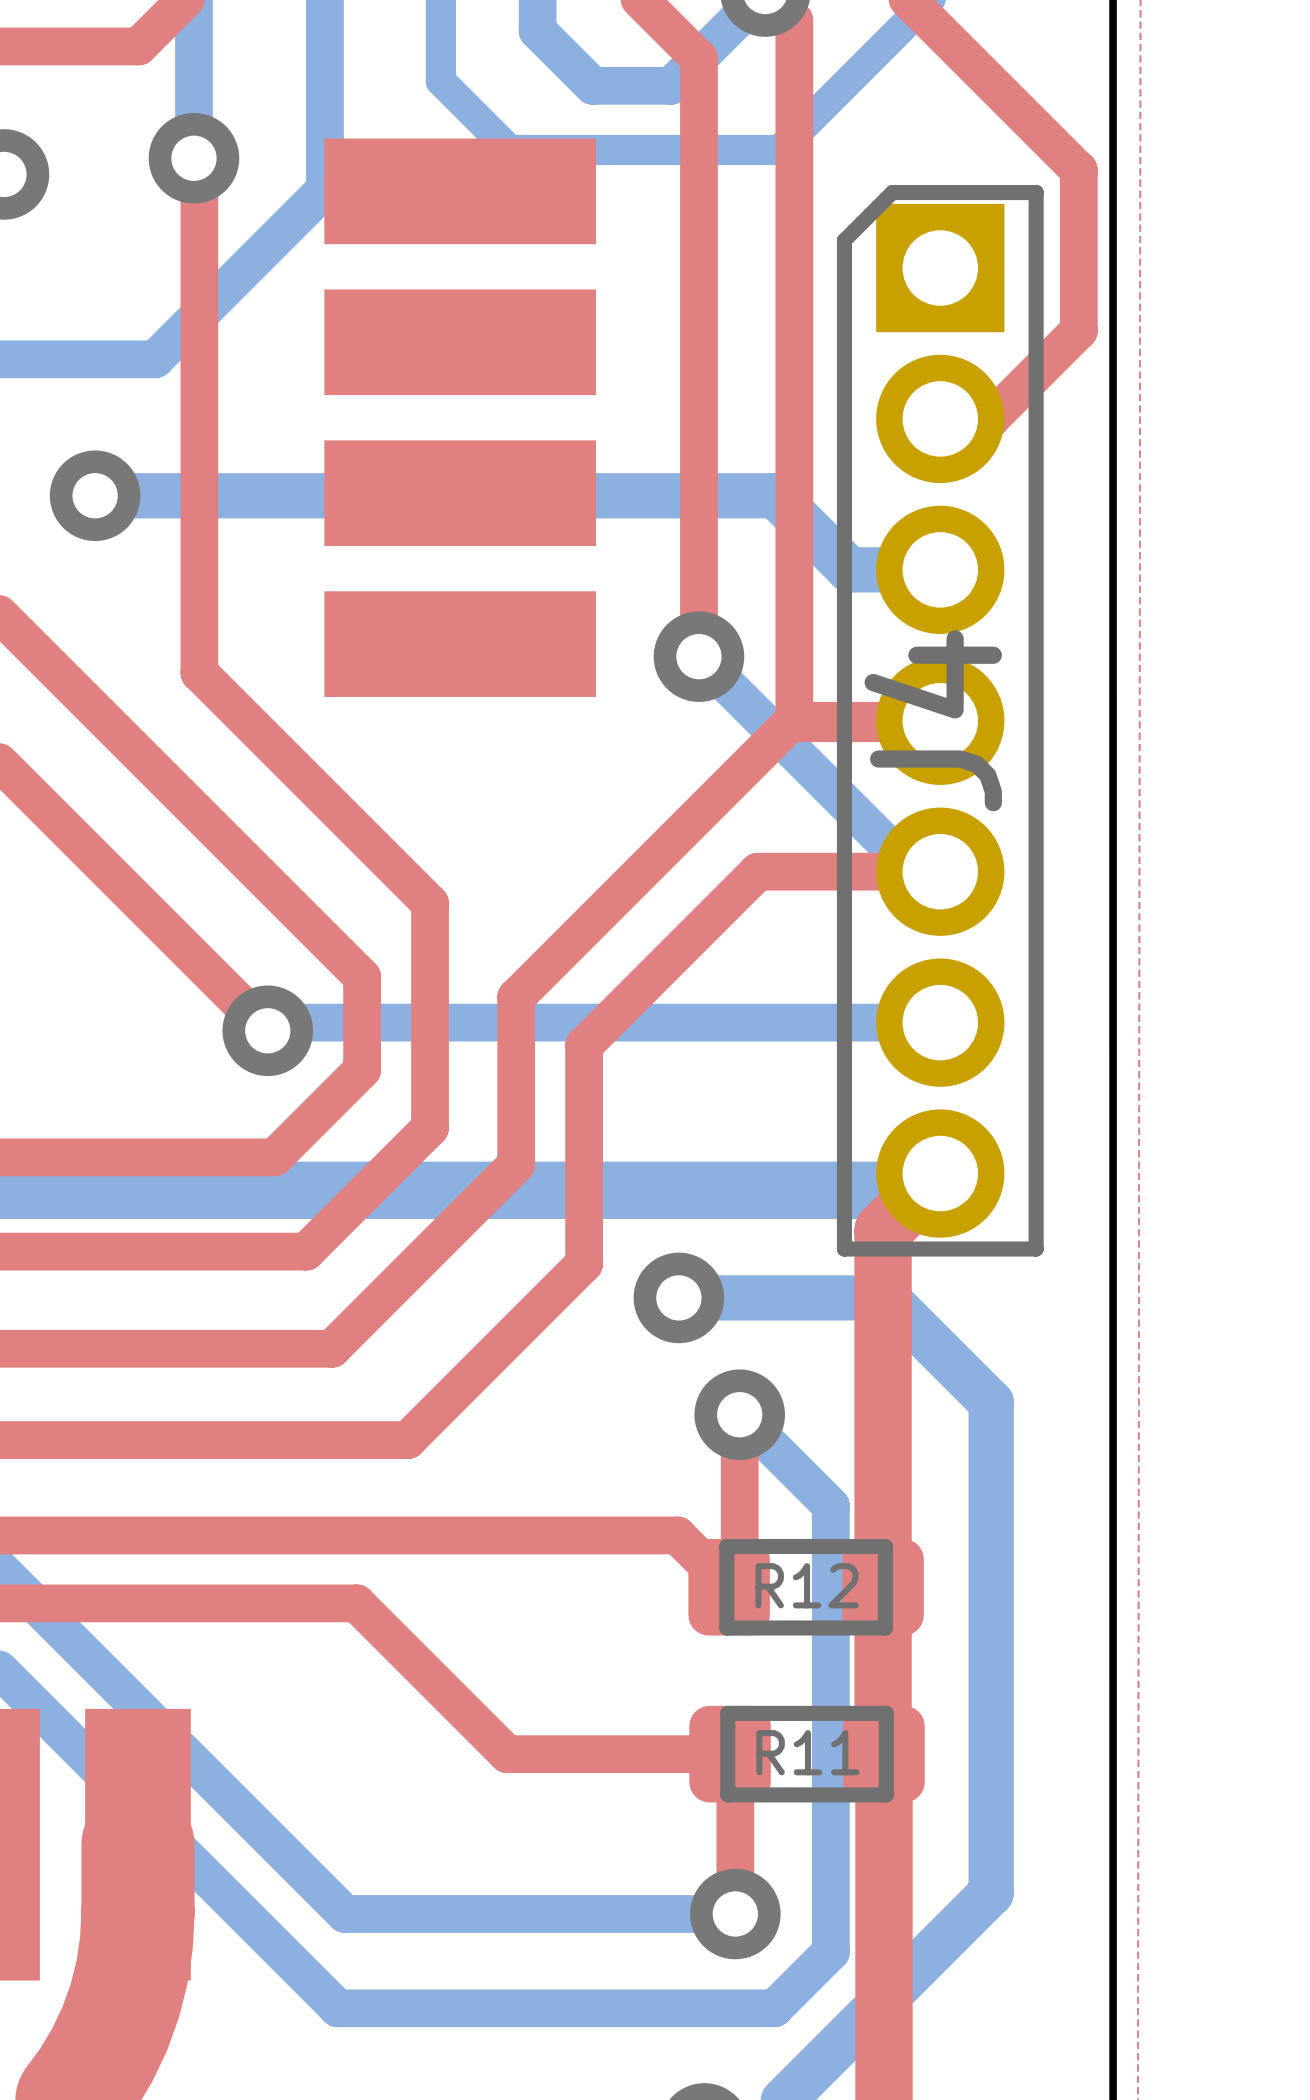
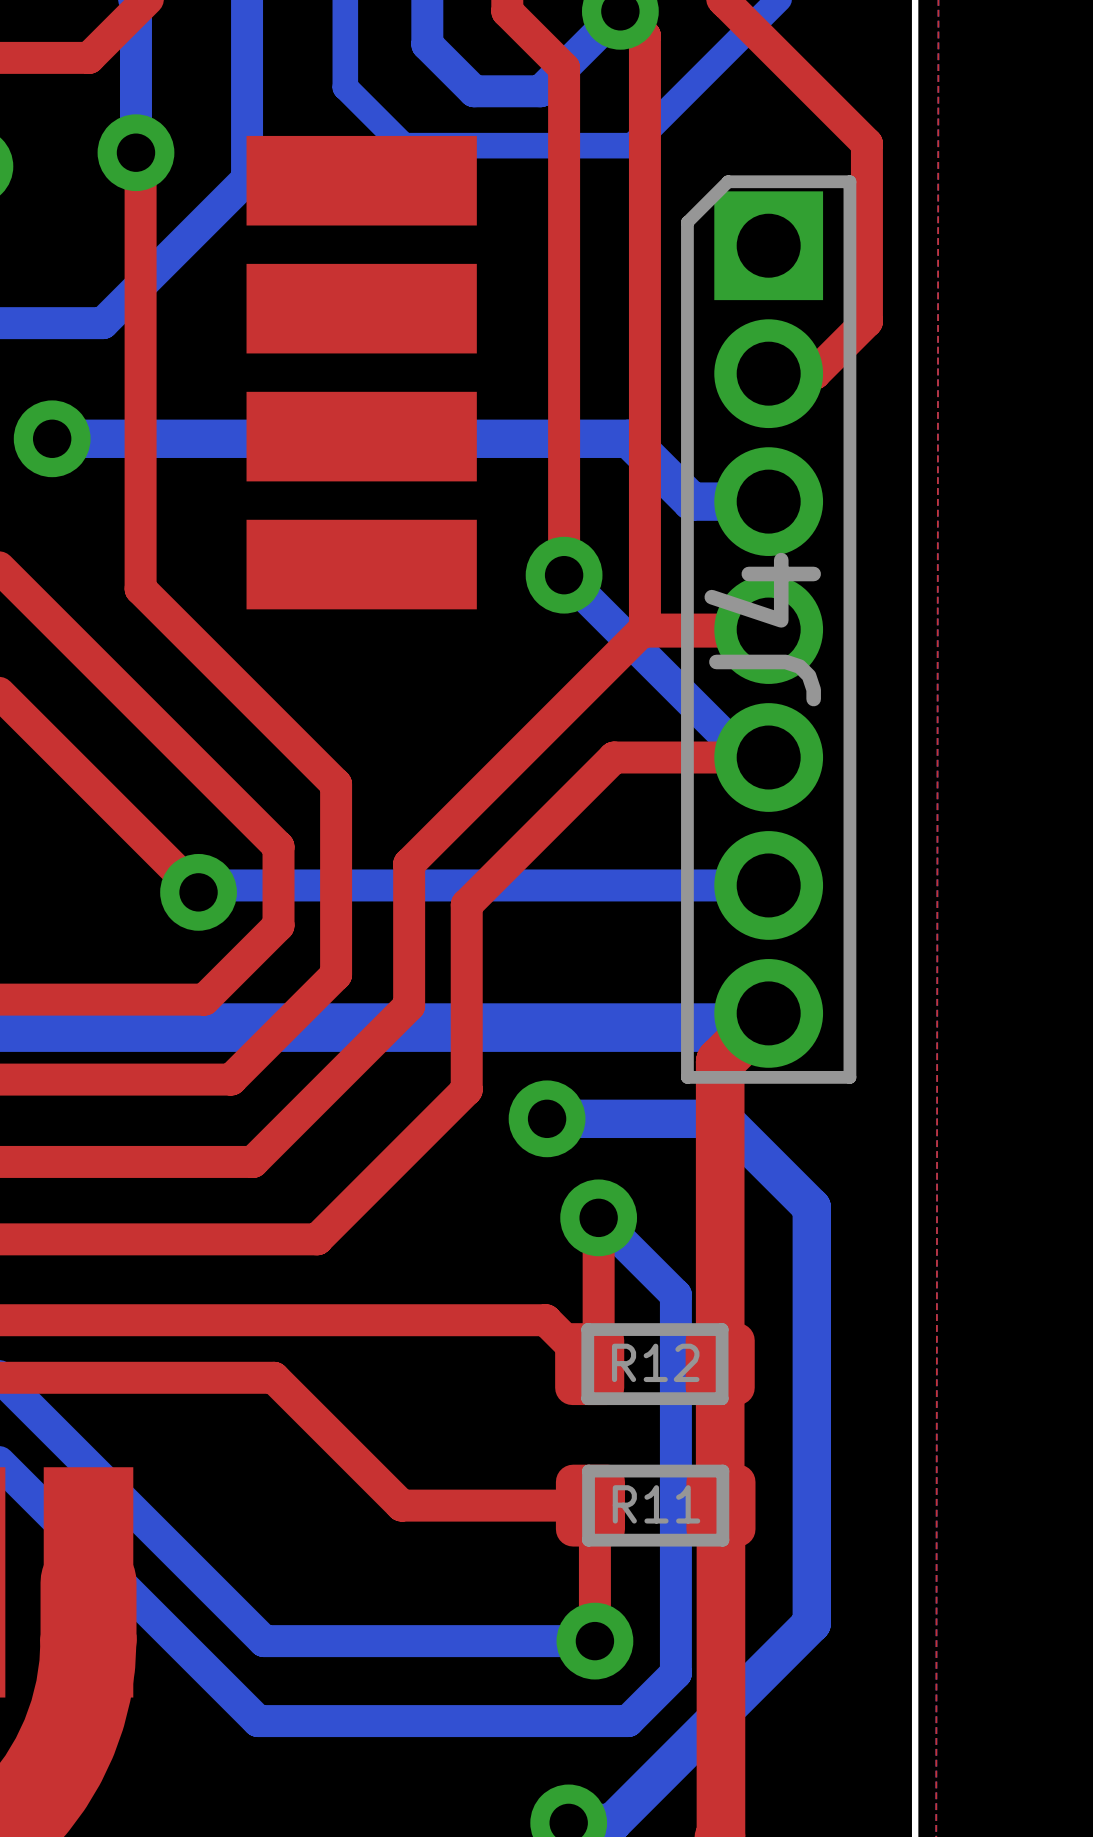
top track: (1056, 147) (1078, 170) (1078, 330) (990, 418) -> (866, 143) (866, 321) (814, 373) (811, 373)

